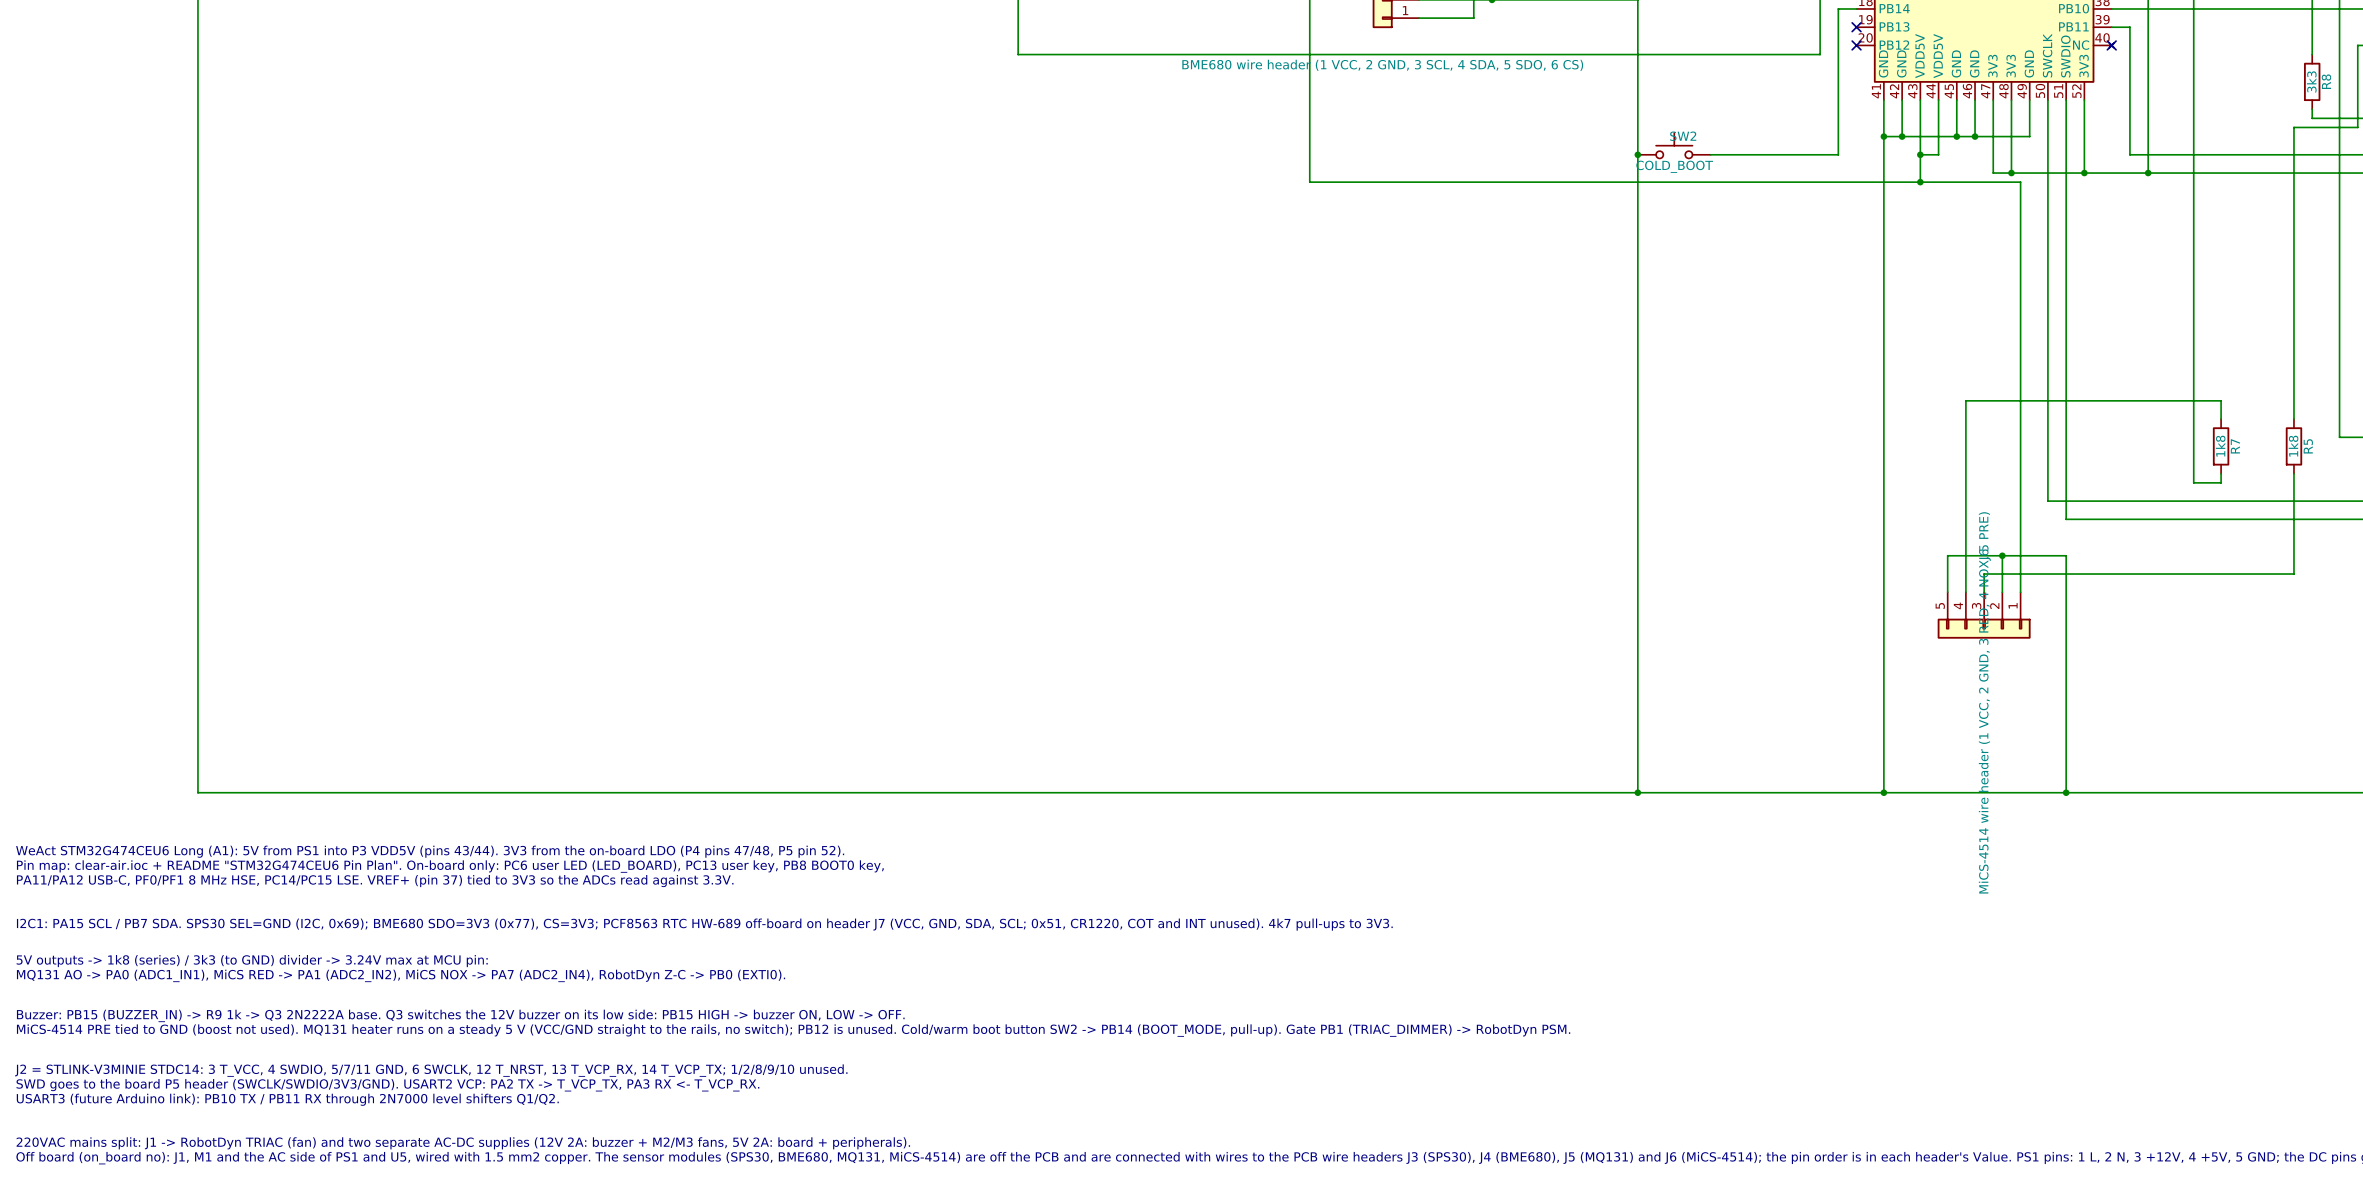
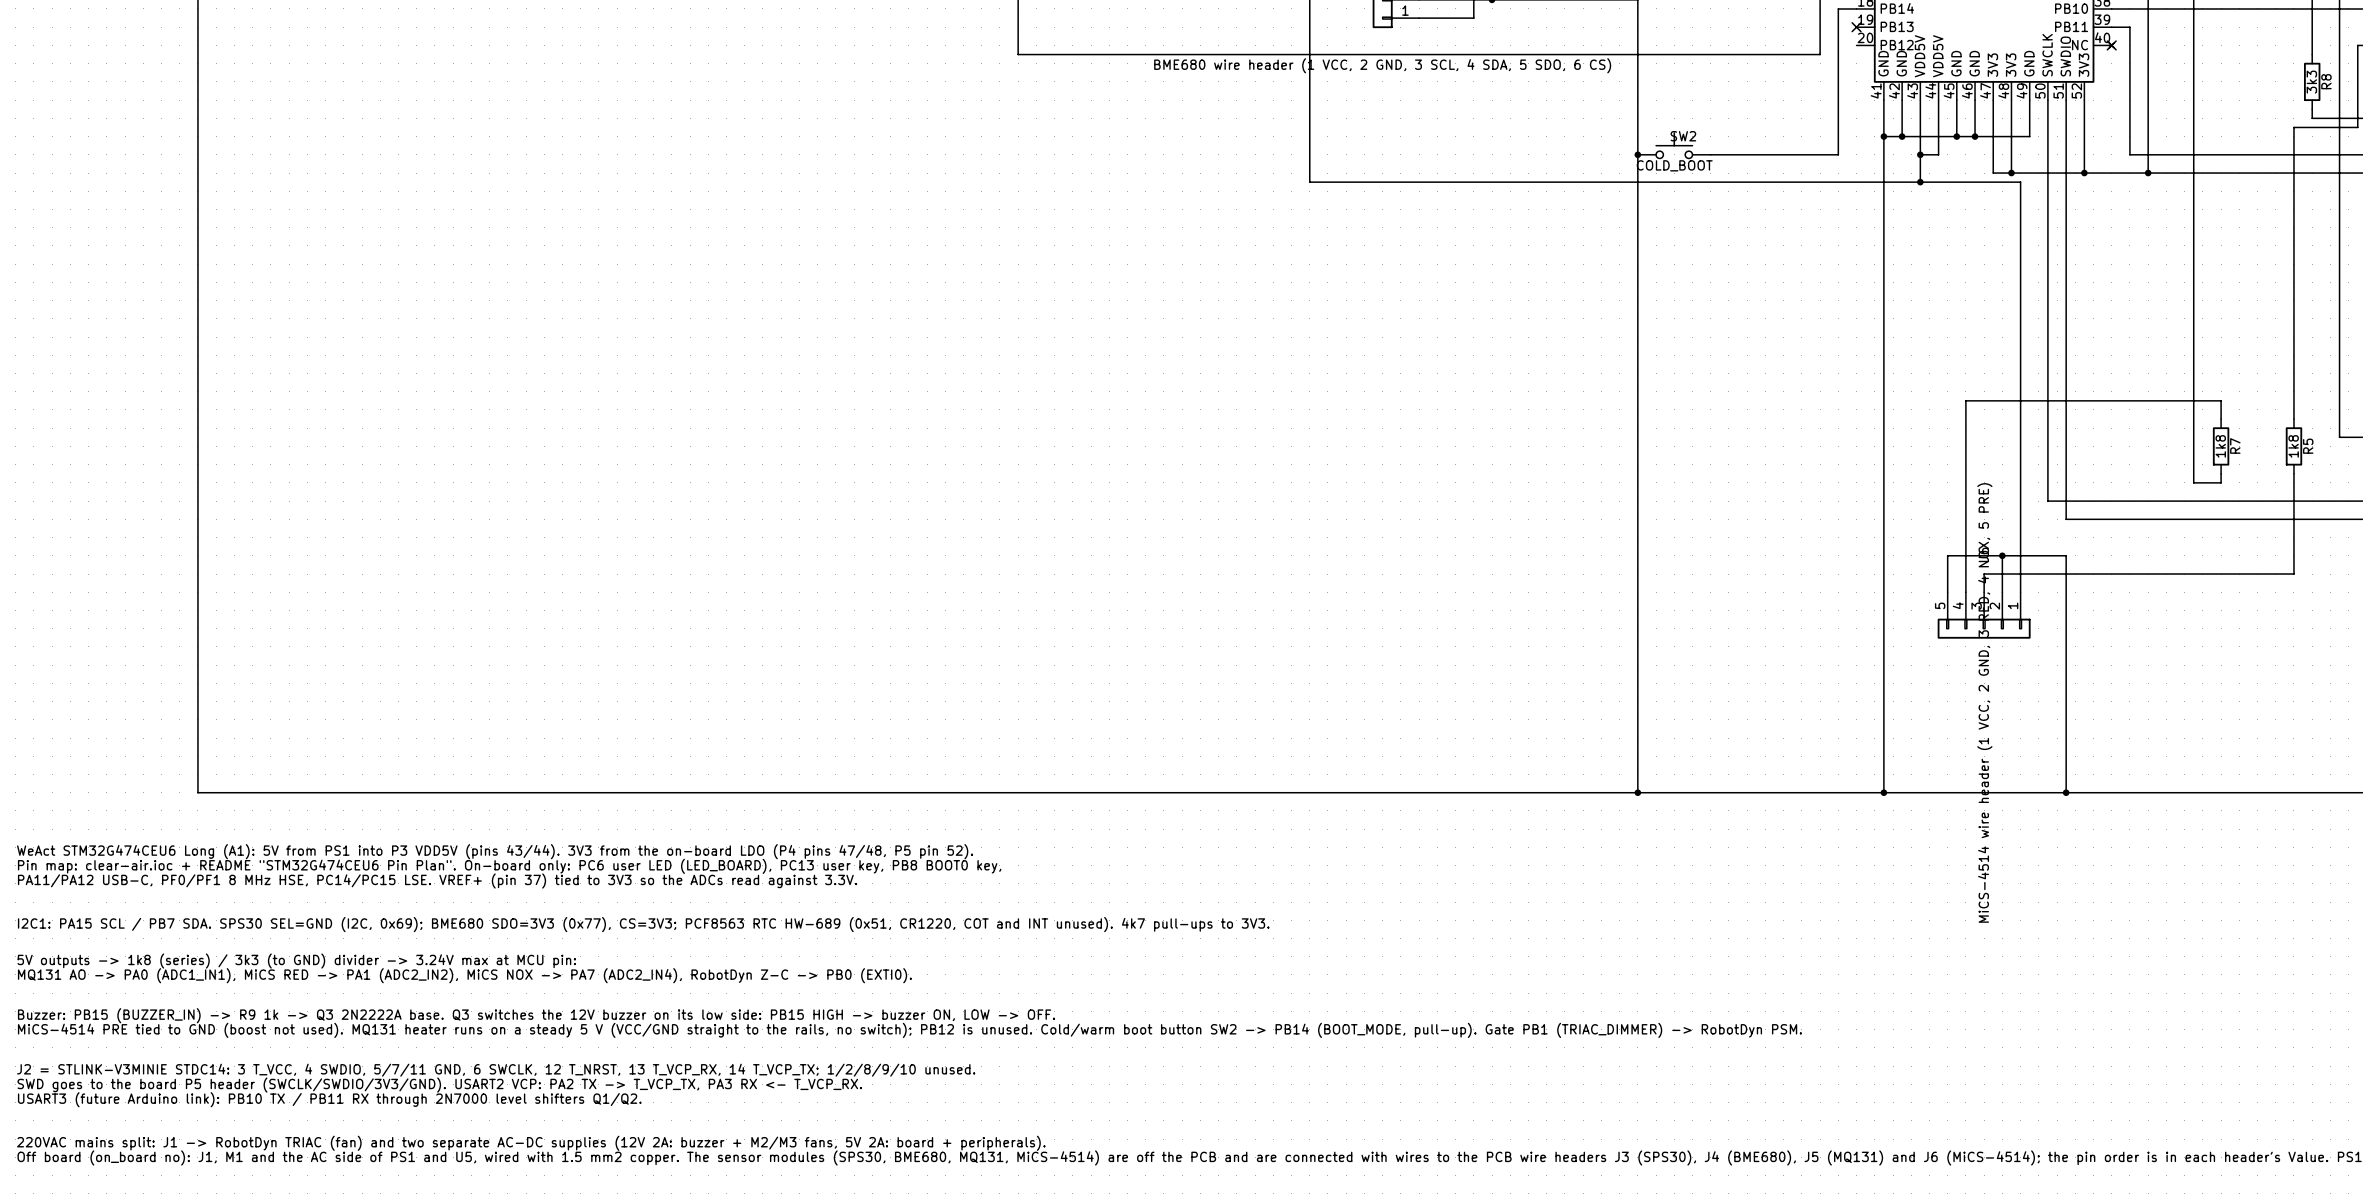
no-connect mark: (1856, 45) -> none
text: I2C1: PA15 SCL / PB7 SDA. SPS30 SEL=GND (I2C, 0x69); BME680 SDO=3V3 (0x77), CS=3V3; PCF8563 RTC HW-689 off-board on header J7 (VCC, GND, SDA, SCL; 0x51, CR1220, COT and INT unused). 4k7 pull-ups to 3V3. (704, 924) -> I2C1: PA15 SCL / PB7 SDA. SPS30 SEL=GND (I2C, 0x69); BME680 SDO=3V3 (0x77), CS=3V3; PCF8563 RTC HW-689 (0x51, CR1220, COT and INT unused). 4k7 pull-ups to 3V3. (643, 924)

